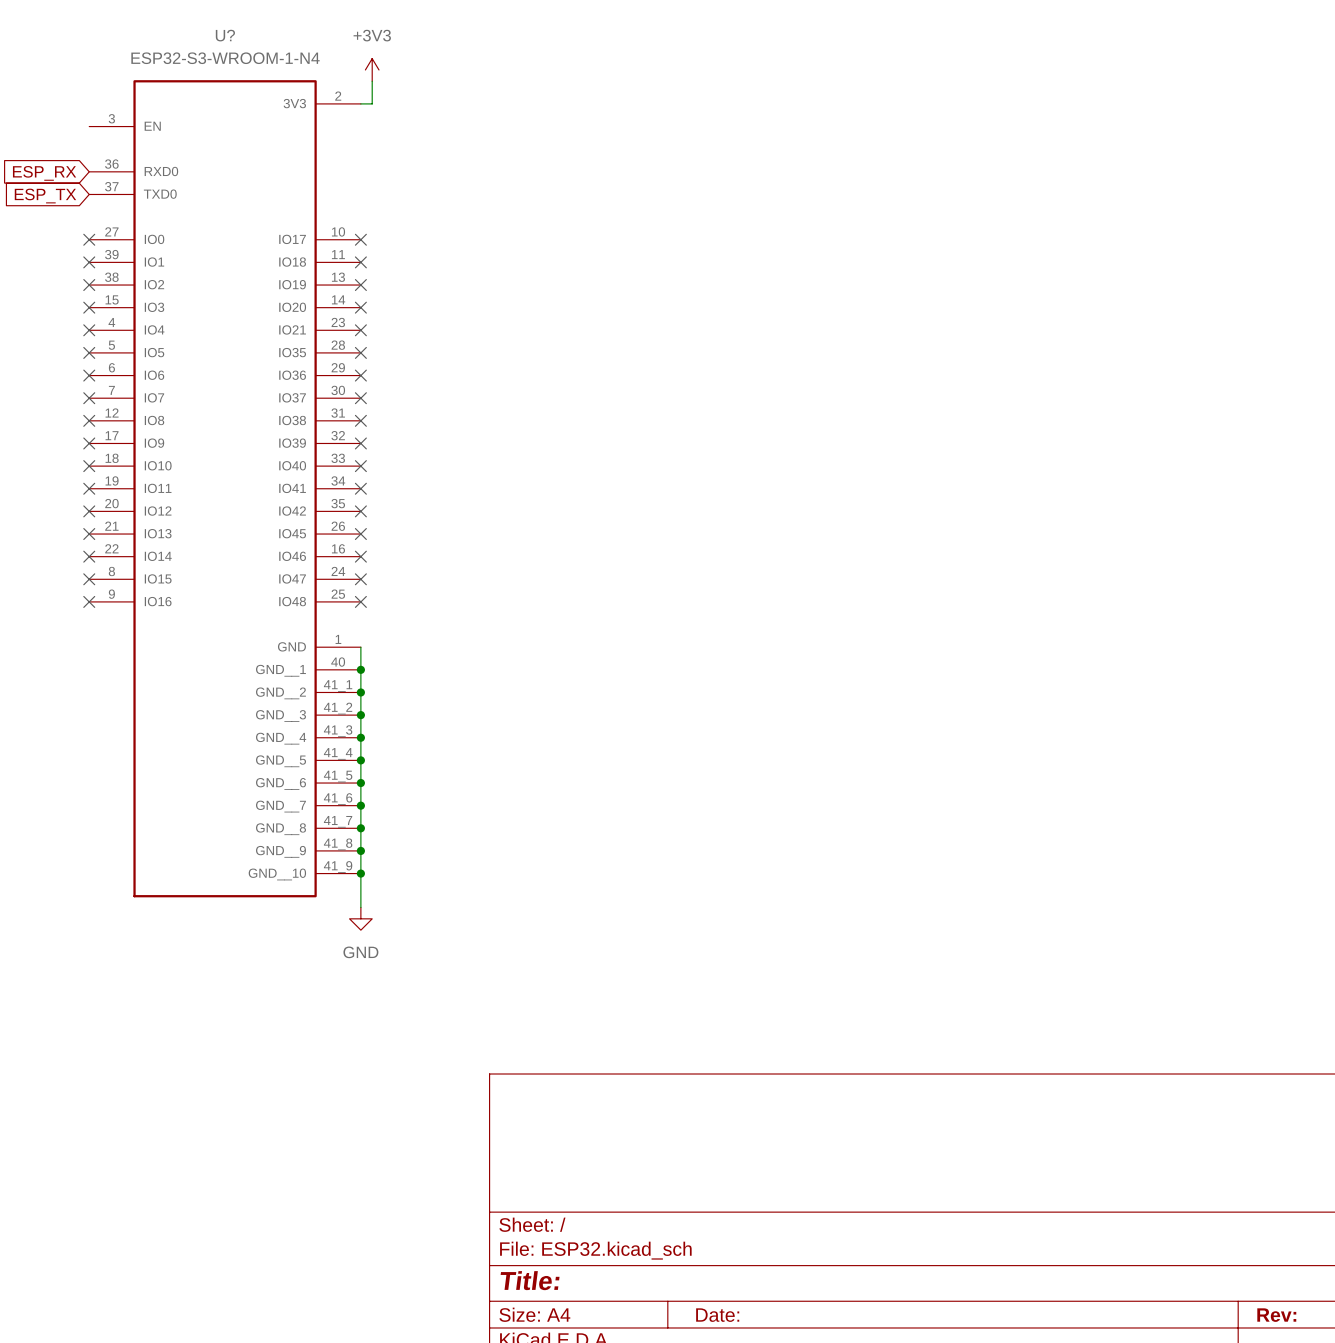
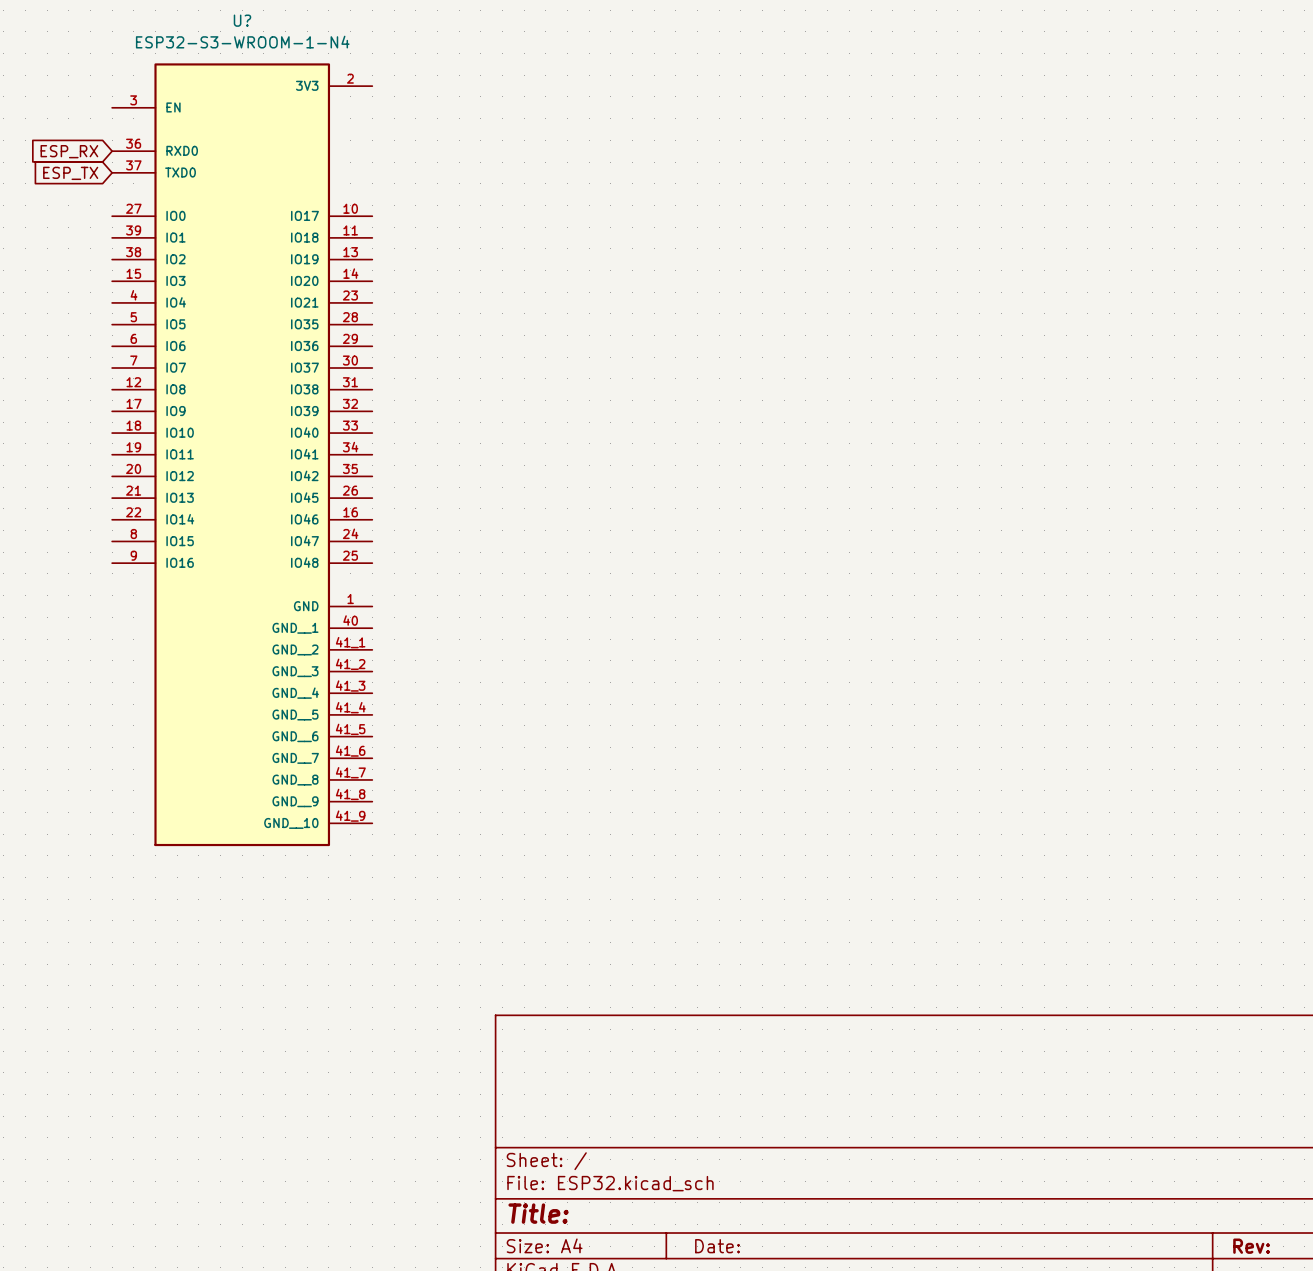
power symbol: +3V3 (372, 69) -> none
wire: (372, 81) (372, 103) (360, 103) -> none
no-connect mark: (89, 239) -> none
no-connect mark: (360, 239) -> none
no-connect mark: (89, 262) -> none
no-connect mark: (360, 262) -> none
no-connect mark: (89, 285) -> none
no-connect mark: (360, 285) -> none
no-connect mark: (89, 307) -> none
no-connect mark: (360, 307) -> none
no-connect mark: (89, 330) -> none
no-connect mark: (360, 330) -> none
no-connect mark: (89, 352) -> none
no-connect mark: (360, 352) -> none
no-connect mark: (89, 375) -> none
no-connect mark: (360, 375) -> none
no-connect mark: (89, 398) -> none
no-connect mark: (360, 398) -> none
no-connect mark: (89, 420) -> none
no-connect mark: (360, 420) -> none
no-connect mark: (89, 443) -> none
no-connect mark: (360, 443) -> none
no-connect mark: (89, 466) -> none
no-connect mark: (360, 466) -> none
no-connect mark: (89, 488) -> none
no-connect mark: (360, 488) -> none
no-connect mark: (89, 511) -> none
no-connect mark: (360, 511) -> none
no-connect mark: (89, 534) -> none
no-connect mark: (360, 534) -> none
no-connect mark: (89, 556) -> none
no-connect mark: (360, 556) -> none
no-connect mark: (89, 579) -> none
no-connect mark: (360, 579) -> none
no-connect mark: (89, 601) -> none
no-connect mark: (360, 601) -> none
wire: (360, 647) (360, 907) -> none
junction: (360, 669) -> none
junction: (360, 692) -> none
junction: (360, 715) -> none
junction: (360, 737) -> none
junction: (360, 760) -> none
junction: (360, 783) -> none
junction: (360, 805) -> none
junction: (360, 828) -> none
junction: (360, 850) -> none
junction: (360, 873) -> none
power symbol: GND (360, 918) -> none

